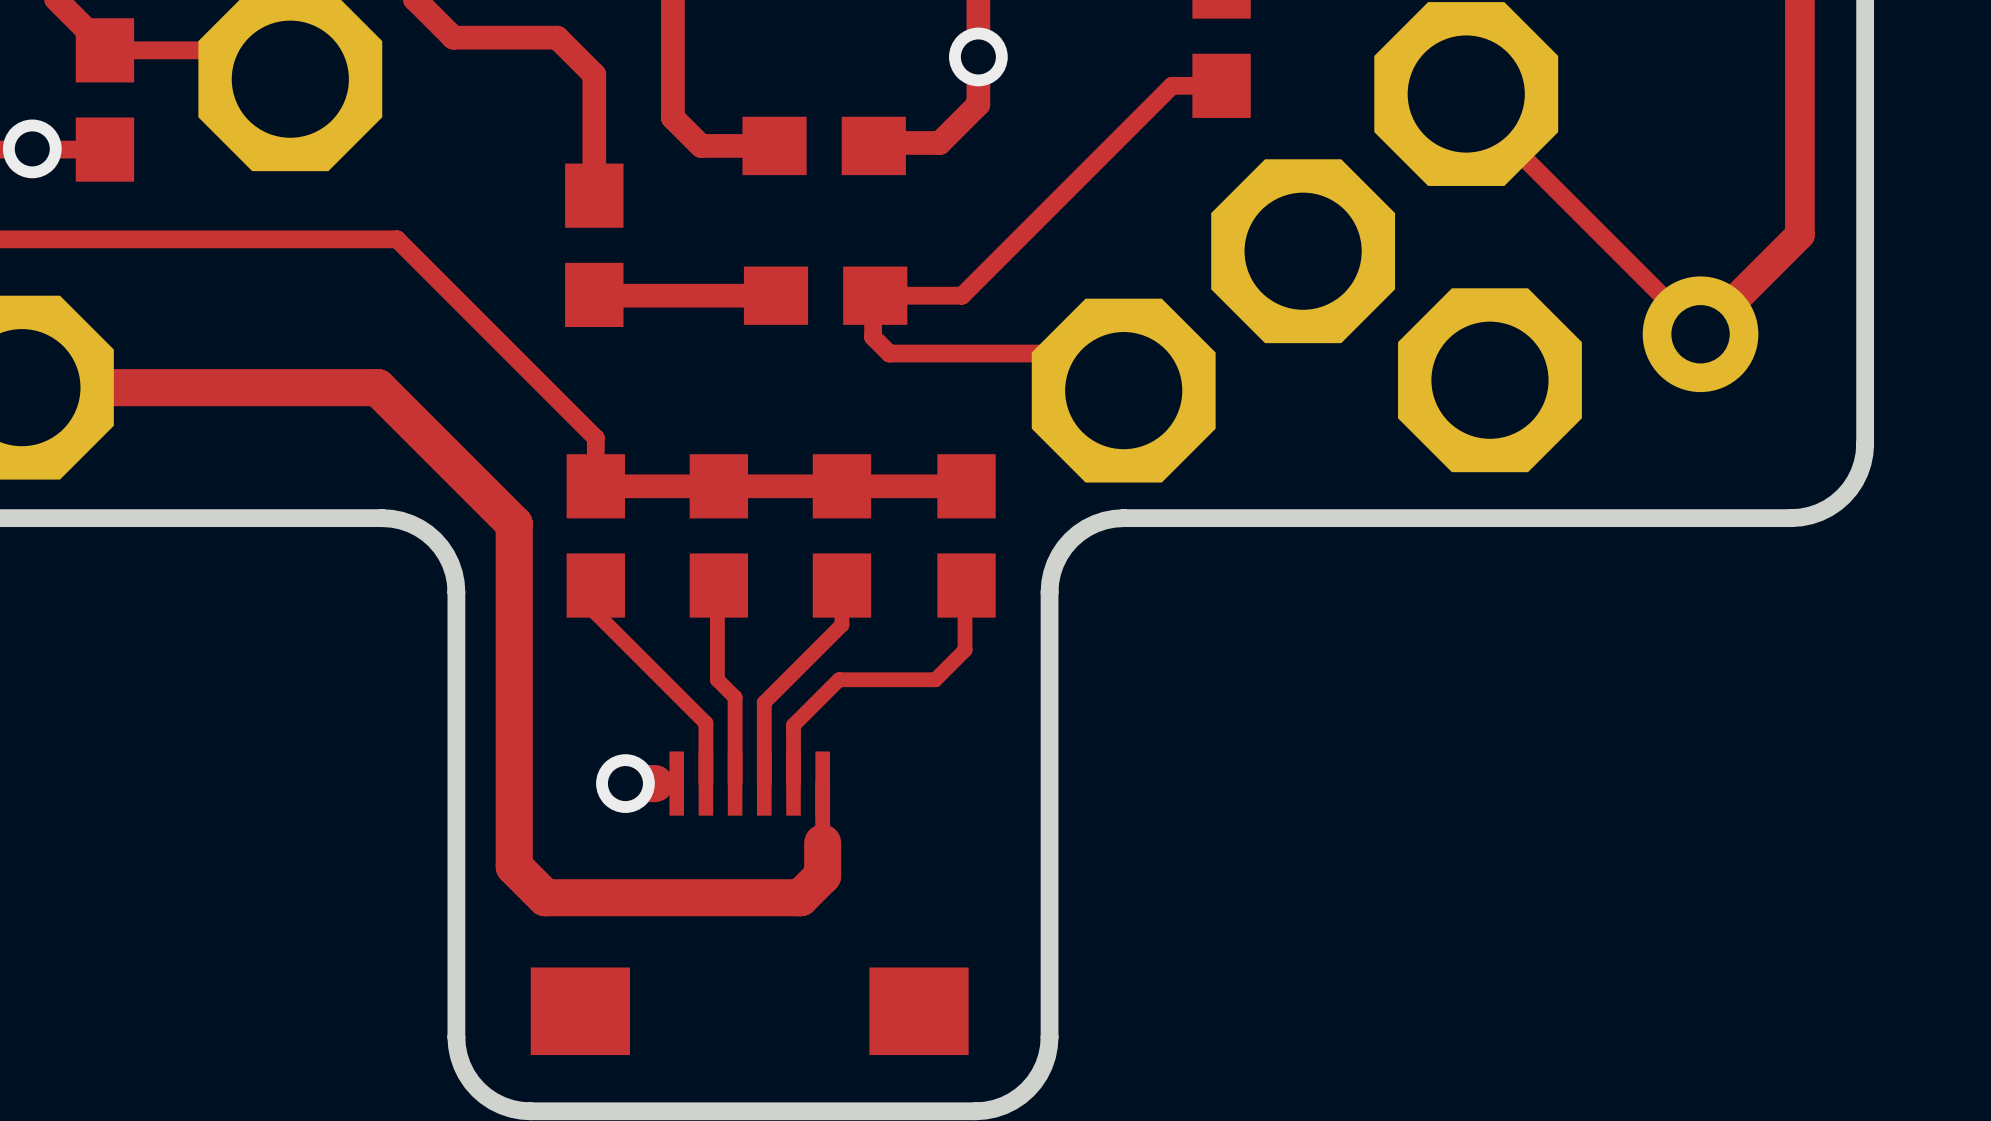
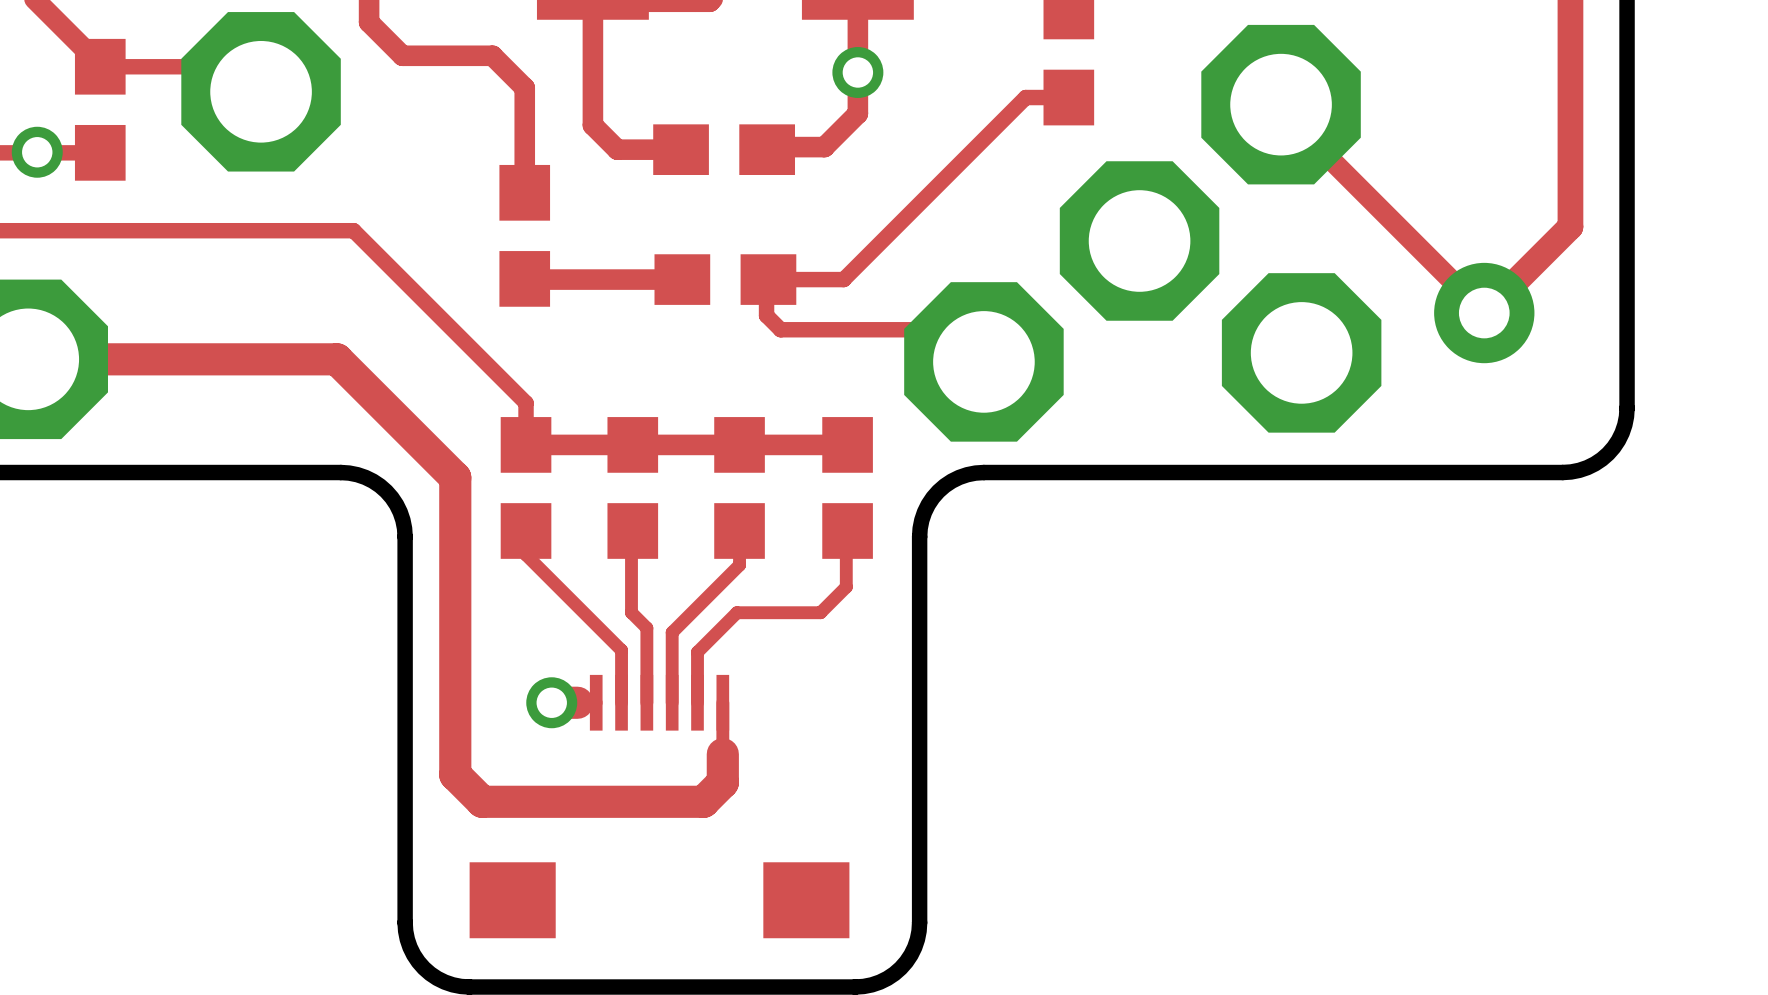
top track width: thin (1466, 99) (1700, 334) -> thick (1281, 109) (1484, 313)

